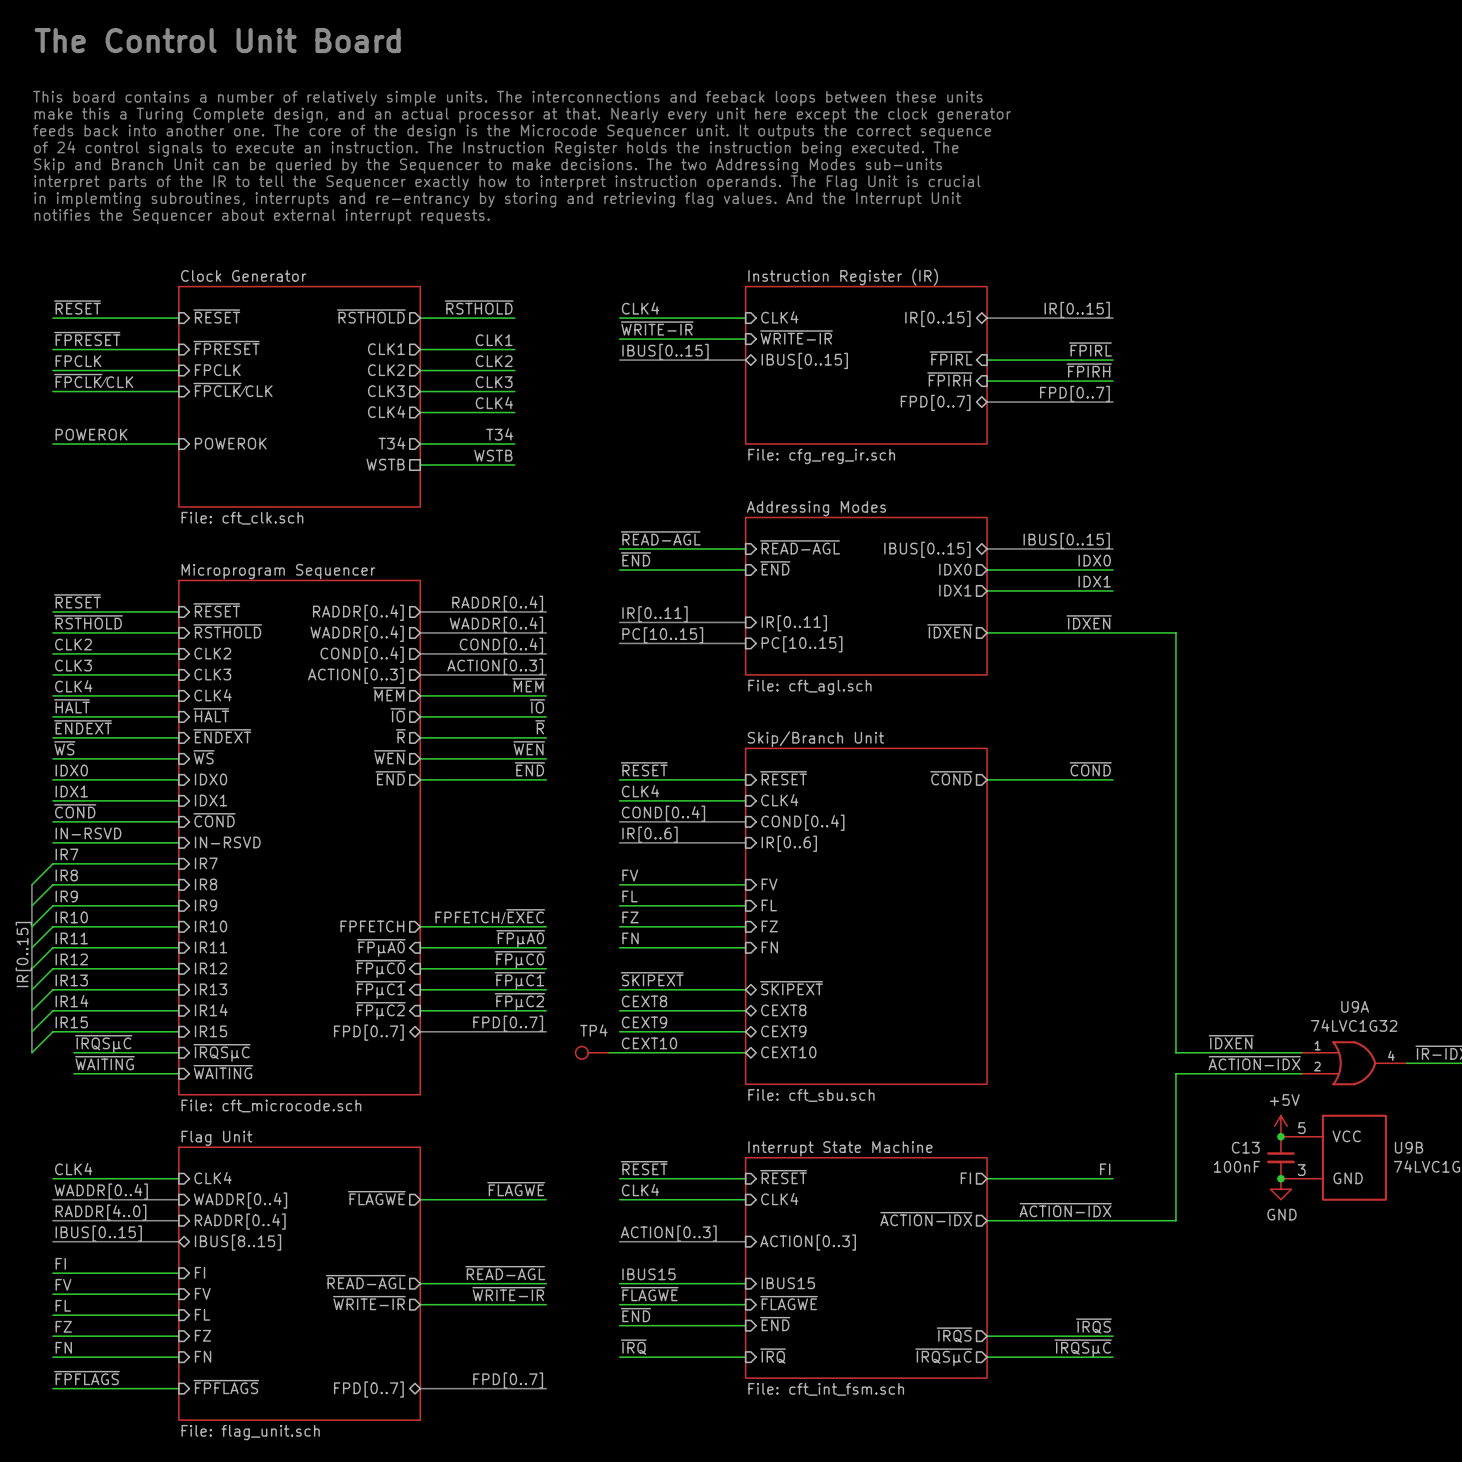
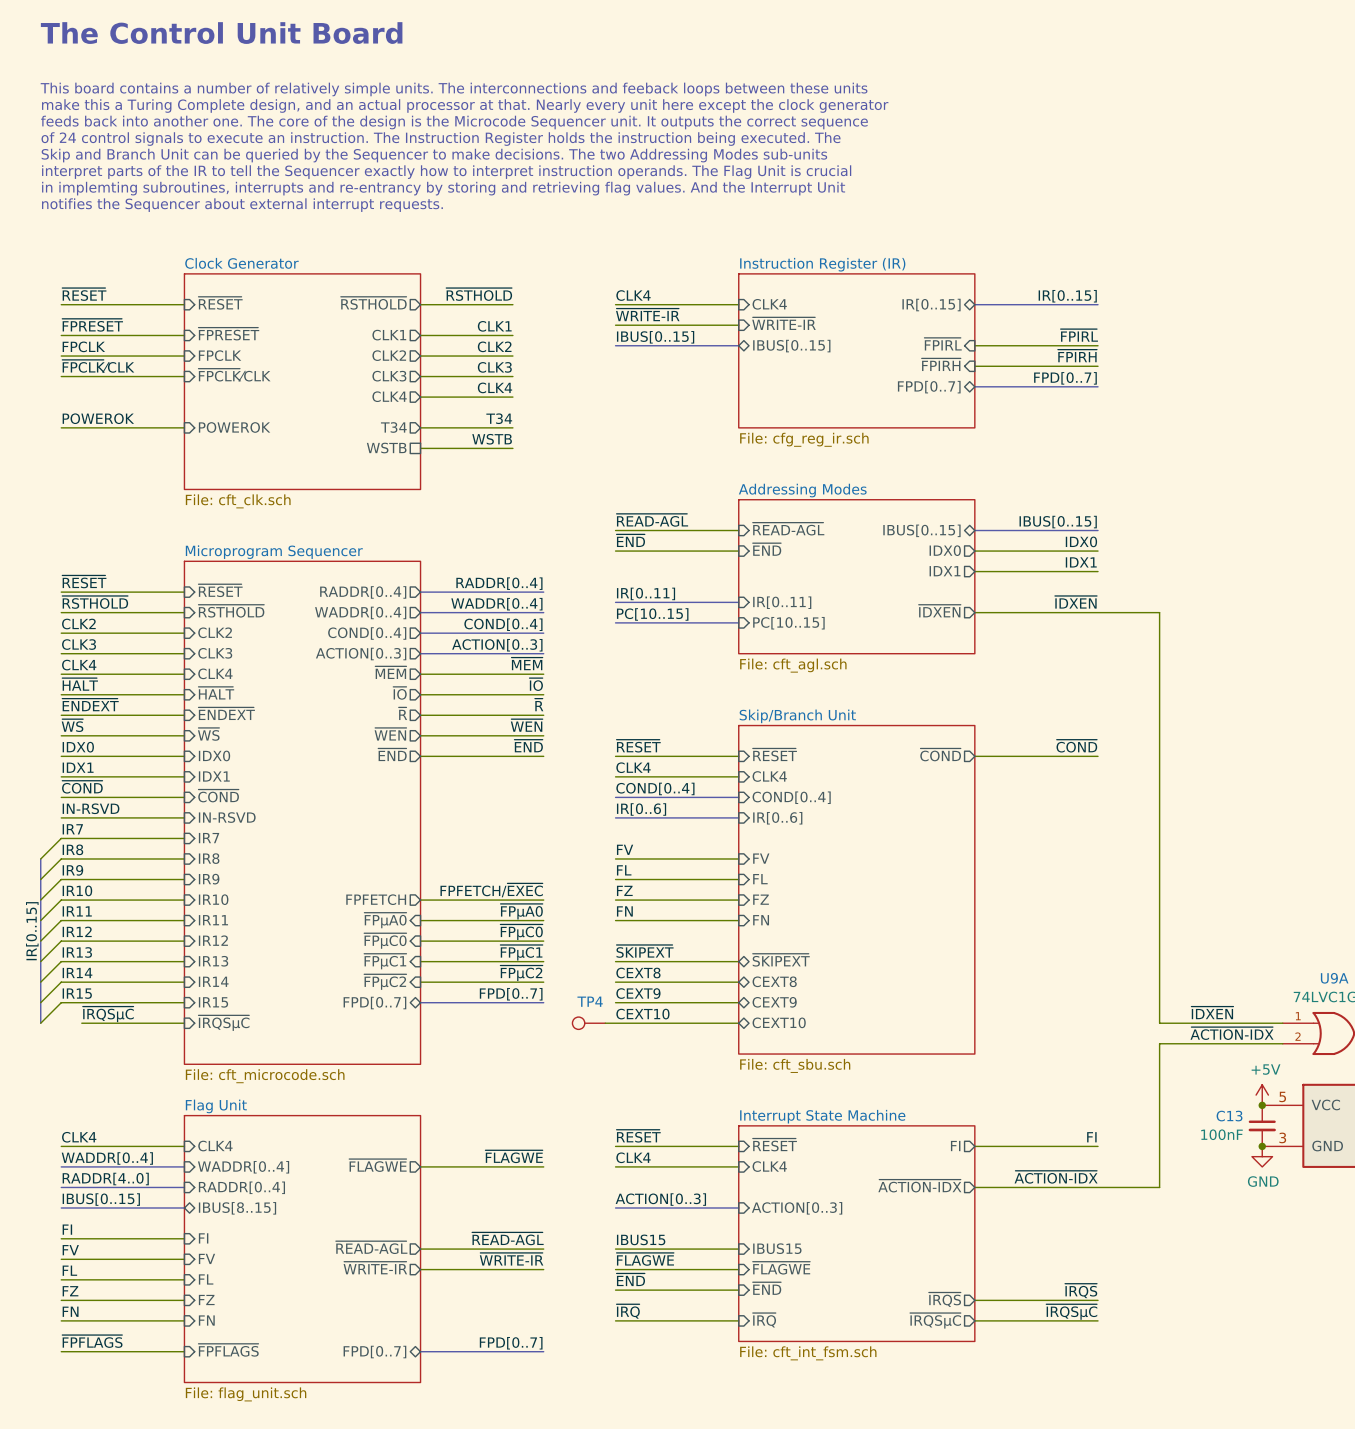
label: ~{WAITING} (104, 1063) -> none
sheet pin: ~{WAITING} (223, 1072) -> none
wire: (73, 1073) (178, 1073) -> none

